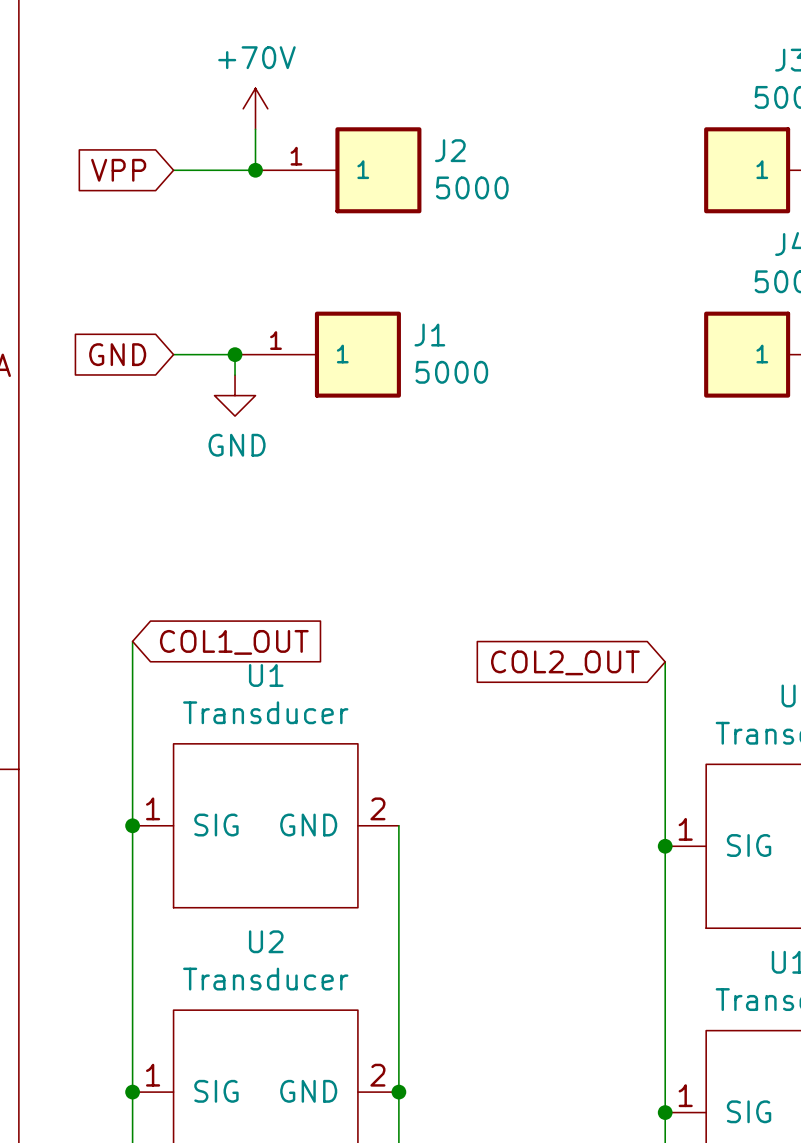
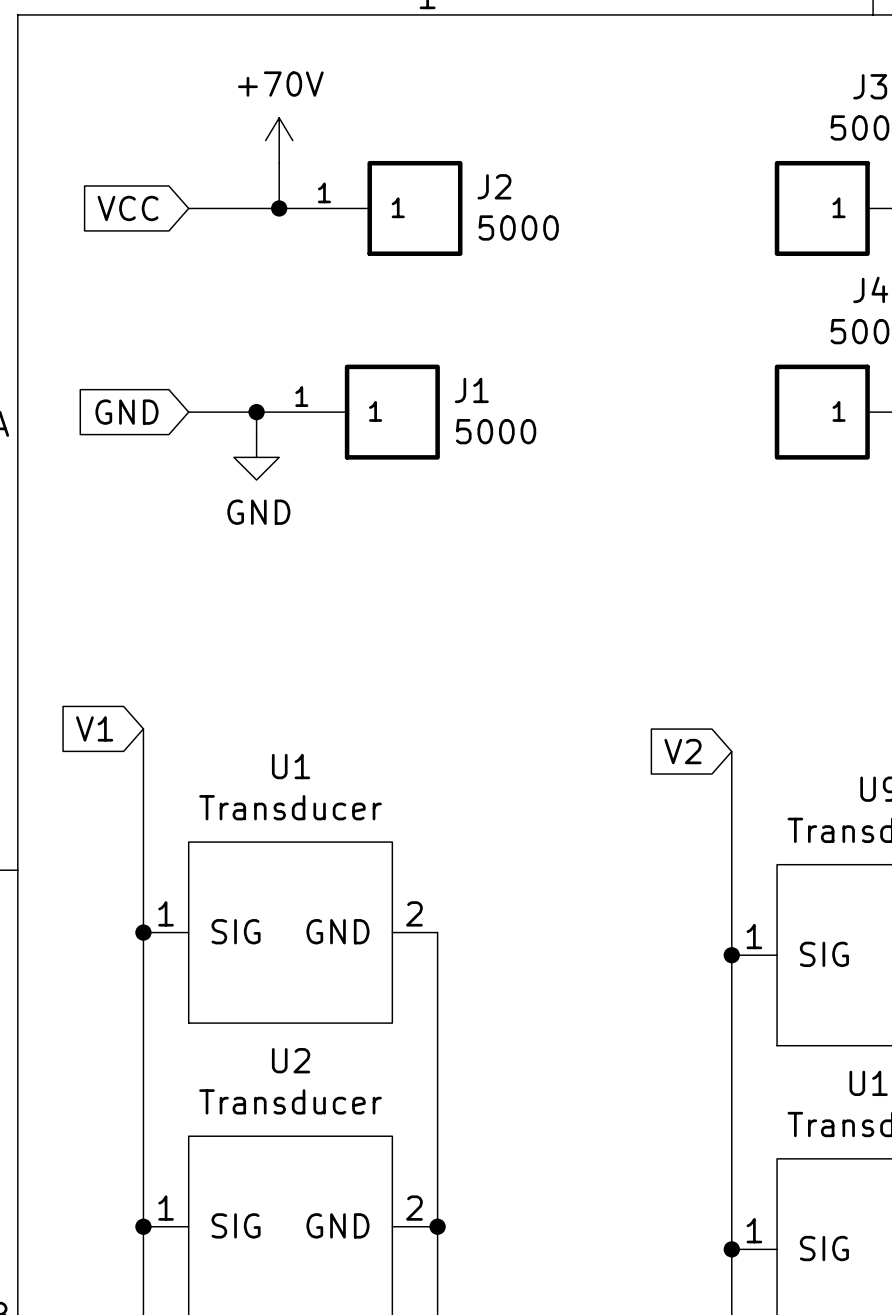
global label: VPP (118, 170) -> VCC (128, 208)
global label: COL1_OUT (234, 642) -> V1 (94, 728)
global label: COL2_OUT (565, 662) -> V2 (682, 751)

